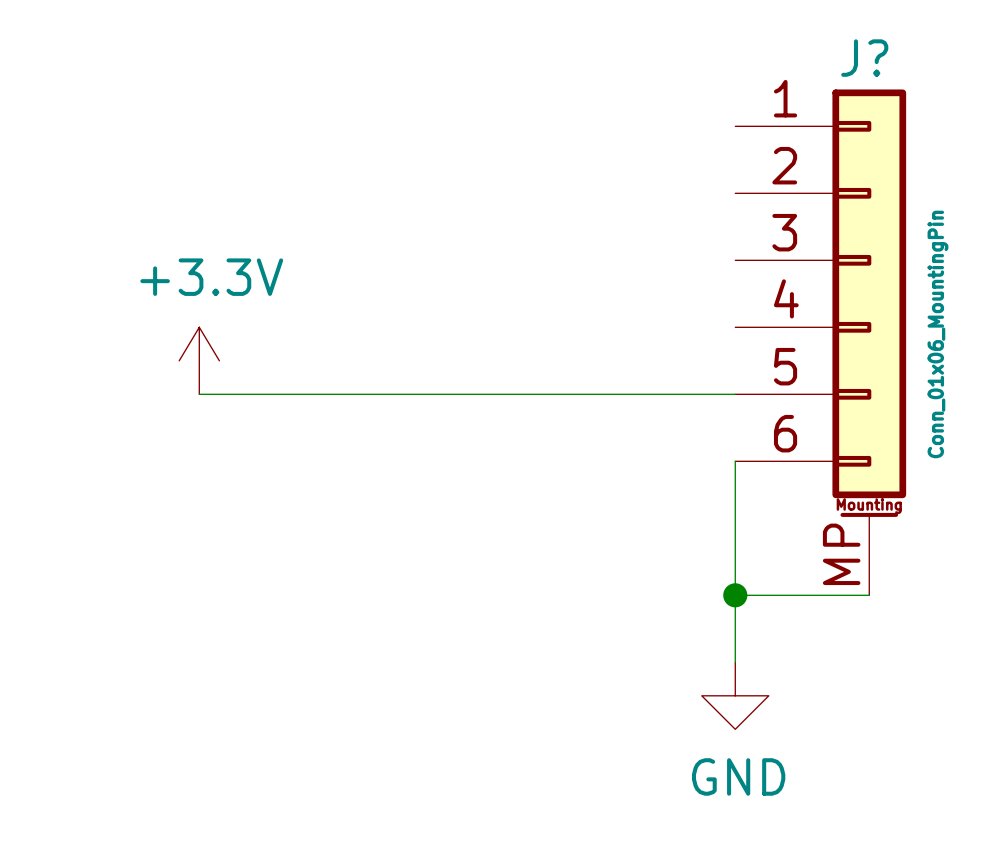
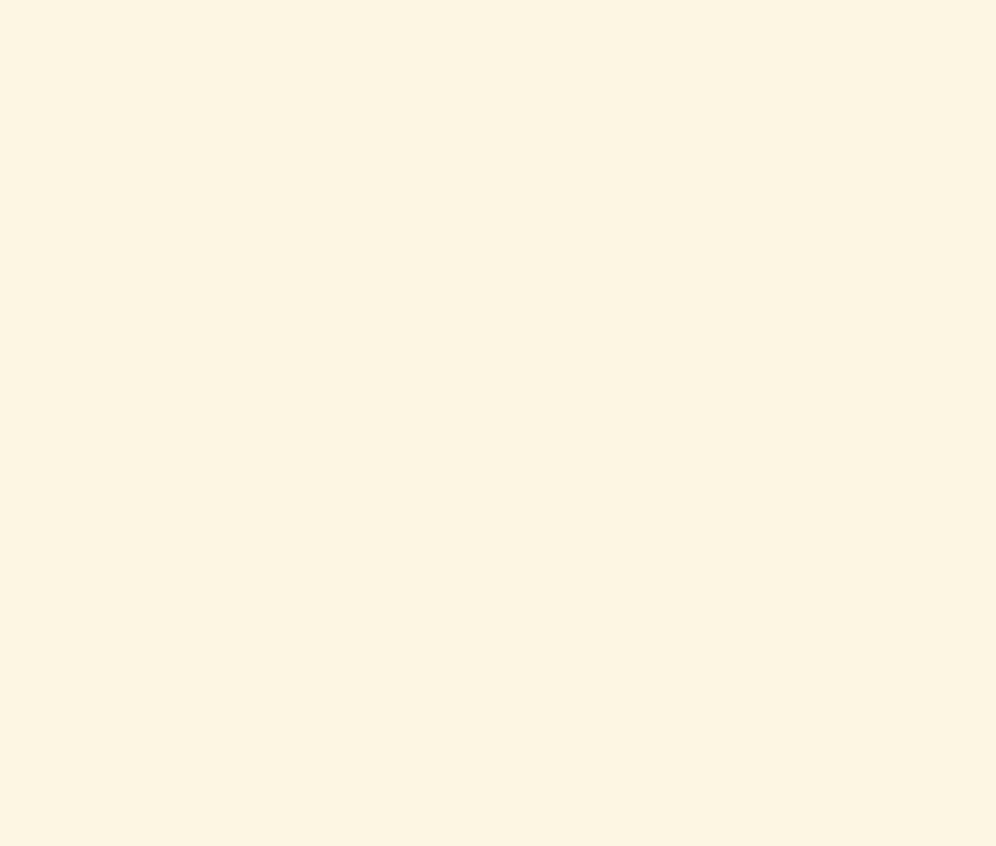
J?: Conn_01x06_MountingPin (820, 342) -> none
power symbol: +3.3V (199, 360) -> none
wire: (199, 394) (735, 394) -> none
wire: (735, 461) (735, 662) -> none
wire: (735, 595) (869, 595) -> none
junction: (735, 595) -> none
power symbol: GND (735, 695) -> none

